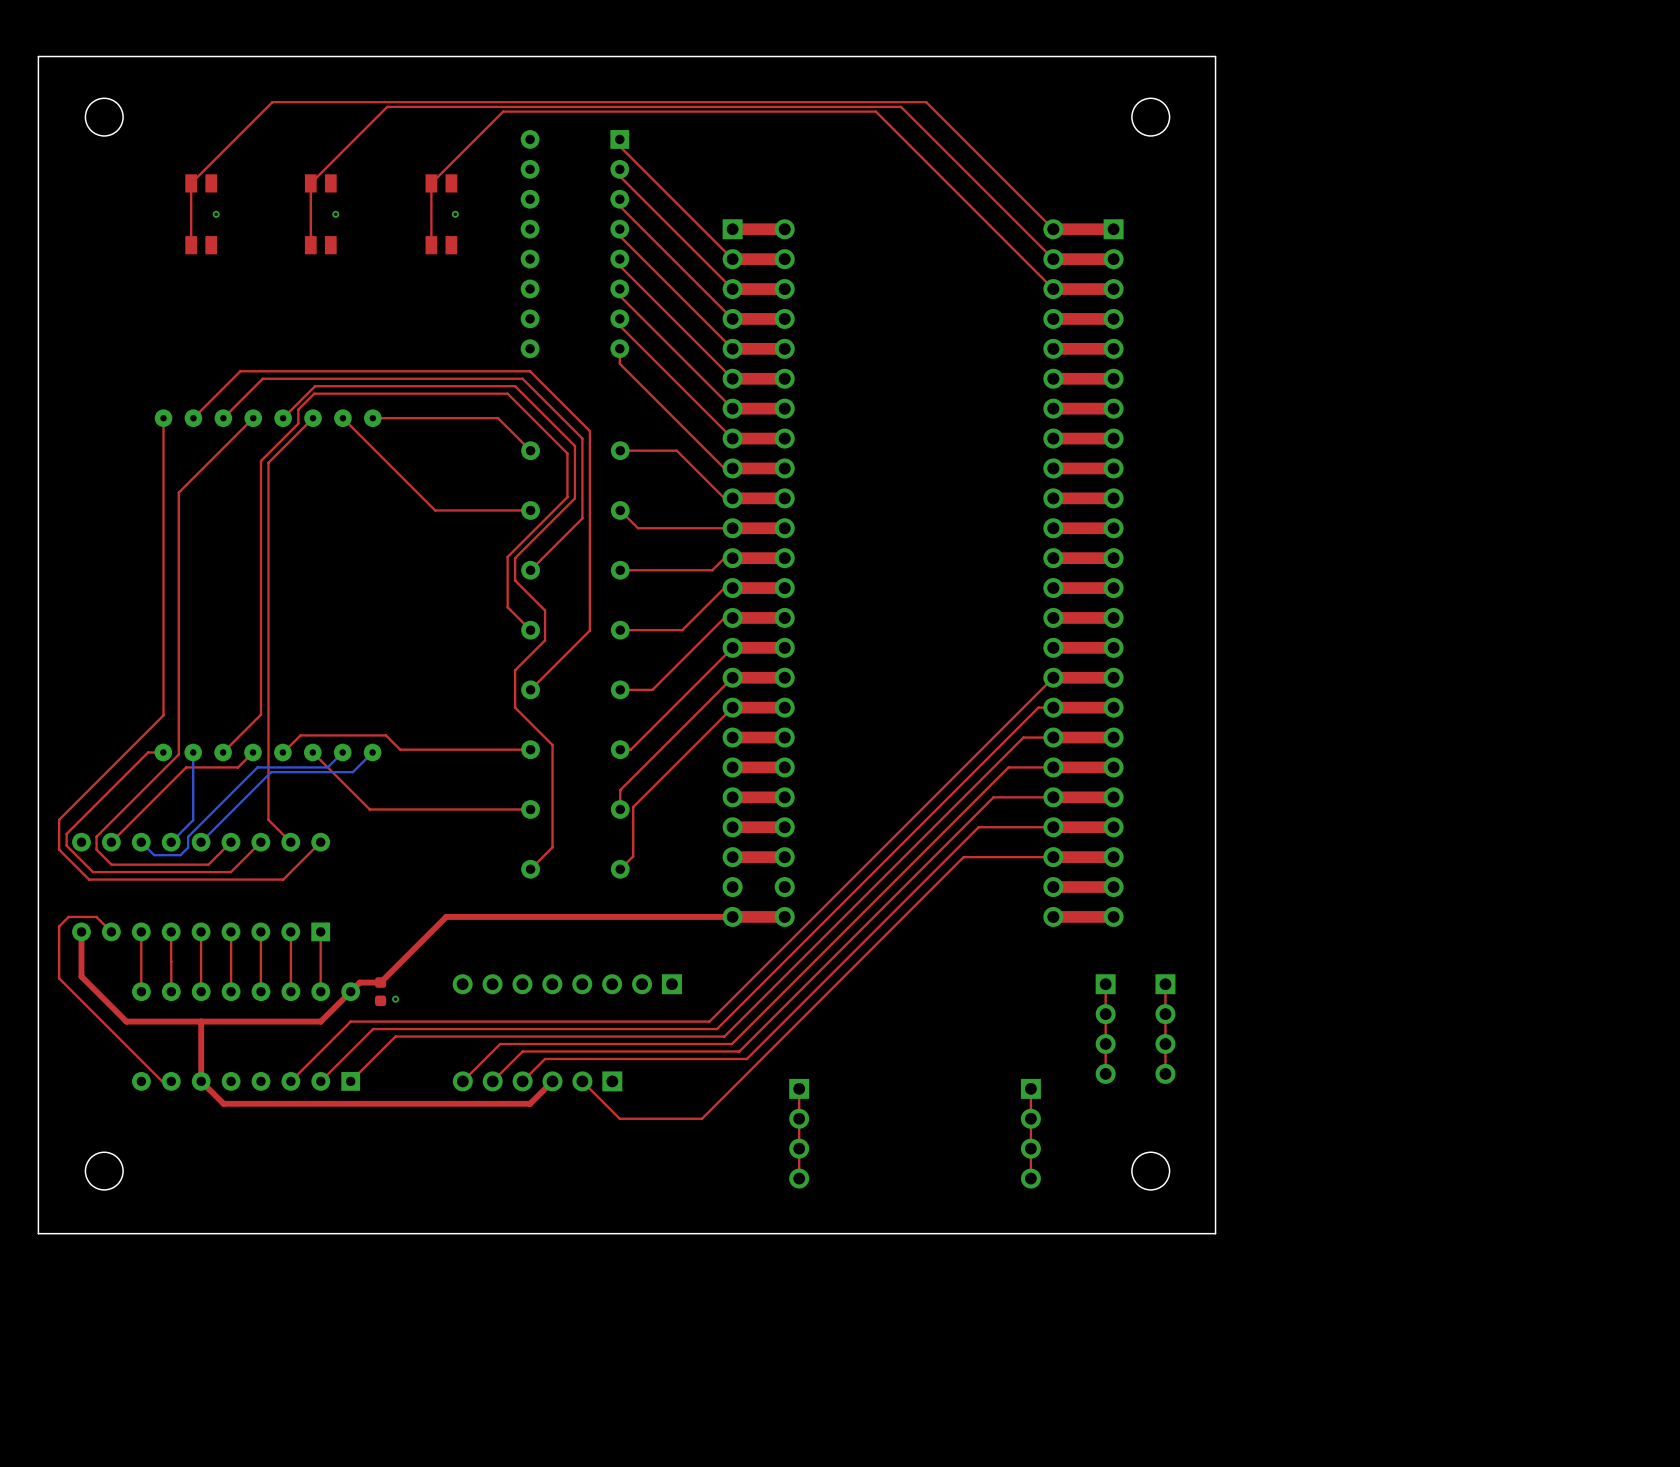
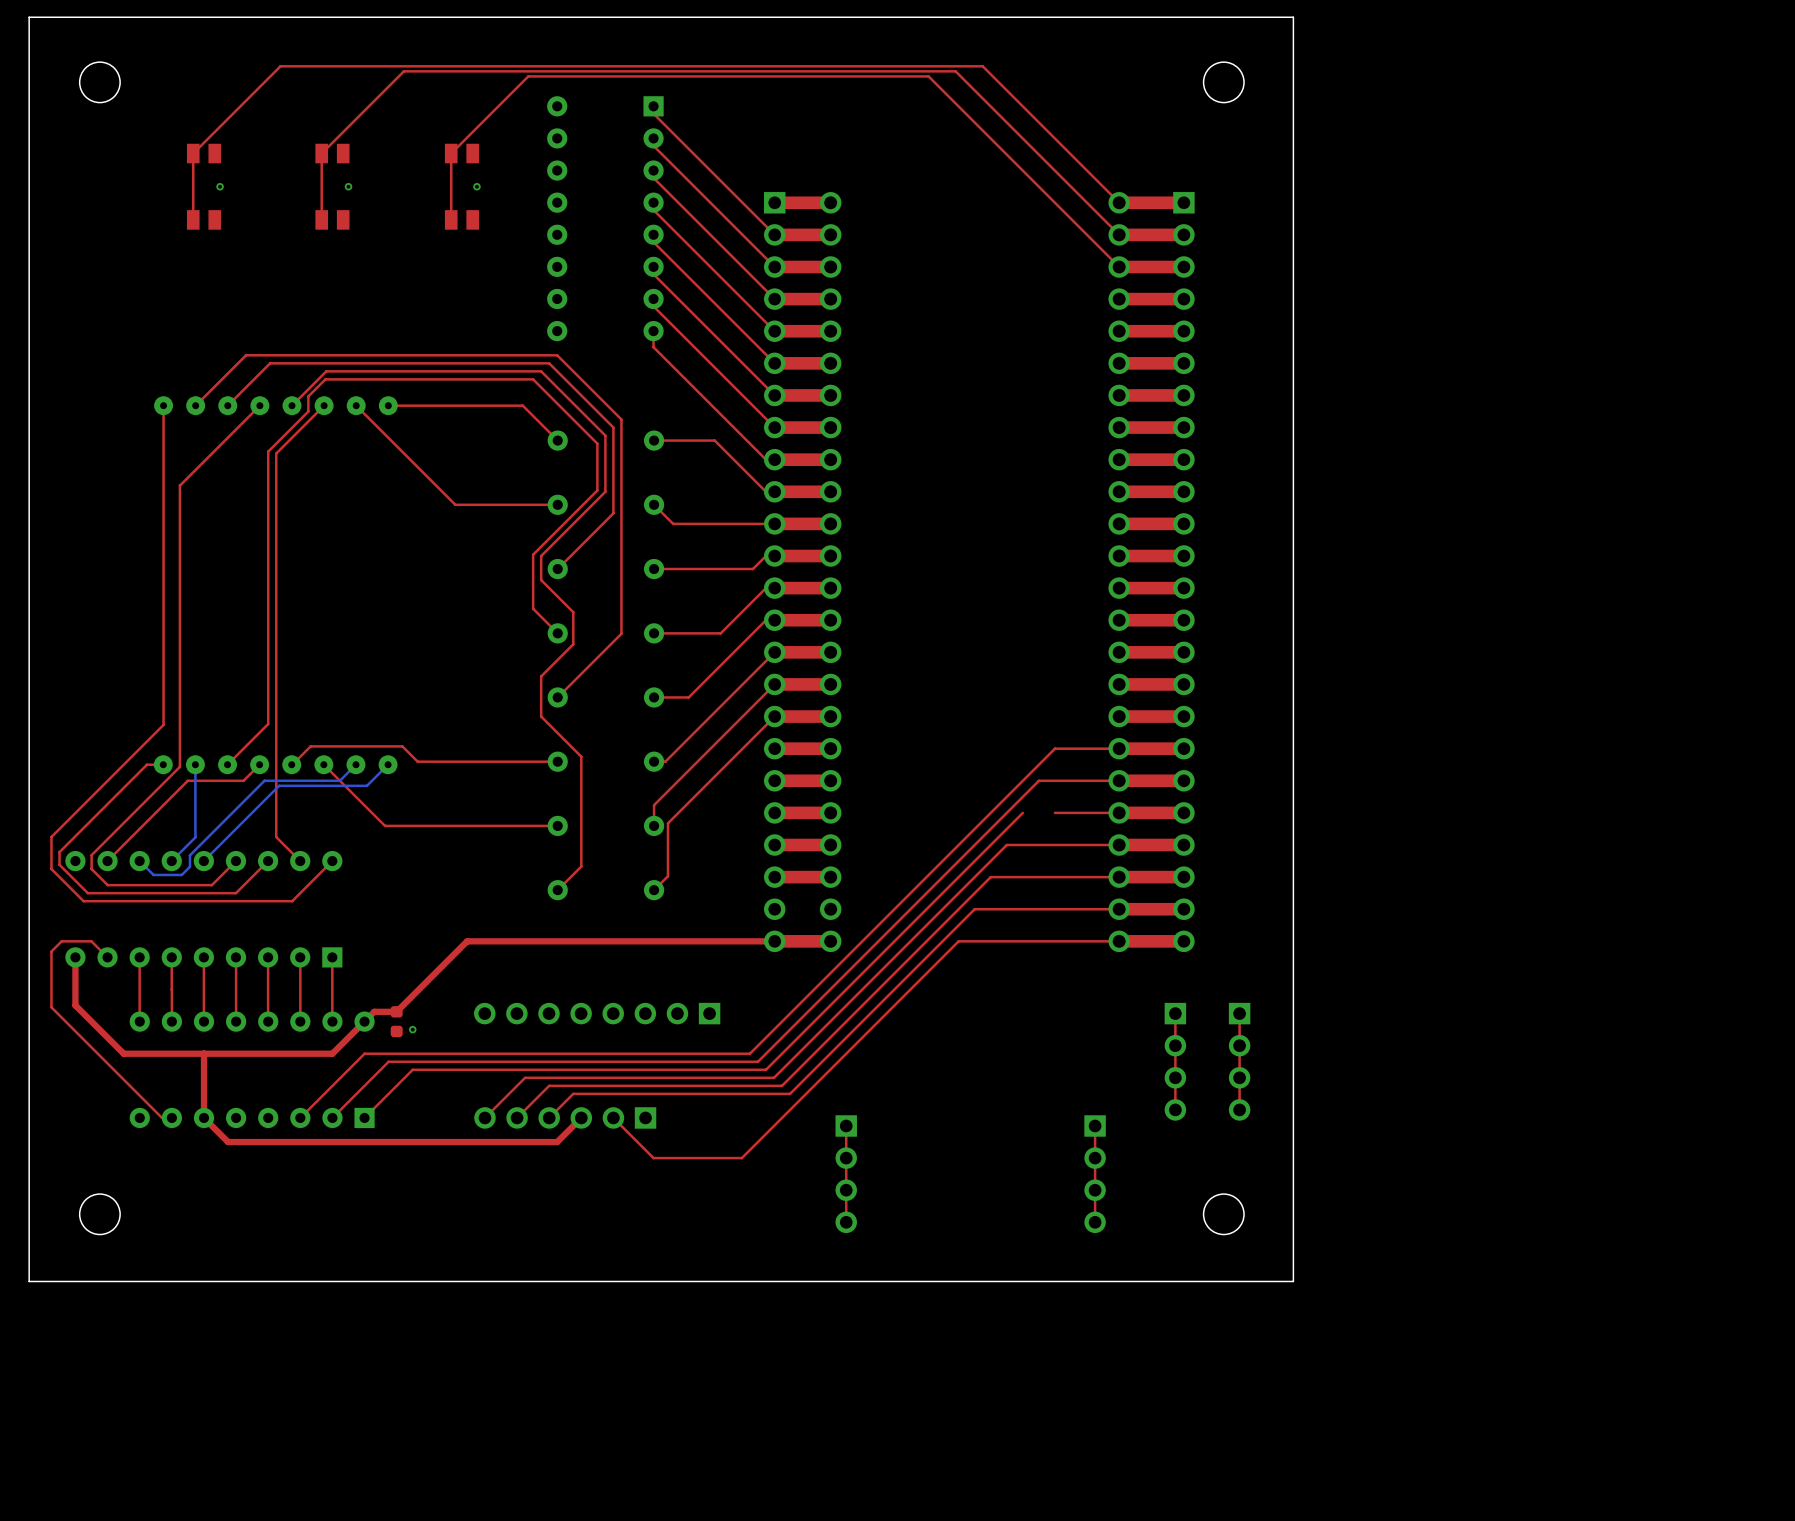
top track: (1053, 677) (993, 737) -> none
top track: (1053, 707) (1038, 707) (978, 767) -> none
top track: (1023, 737) (963, 797) -> (1087, 748) (1054, 748)
top track: (1008, 767) (948, 827) -> (1071, 780) (1038, 780)
top track: (993, 797) (933, 857) -> (1022, 877) (990, 877)
top track: (978, 827) (918, 887) -> (1038, 845) (1006, 845)
top track: (963, 857) (903, 916) -> (1119, 941) (958, 941)
top track: none -> (1119, 909) (974, 909)

